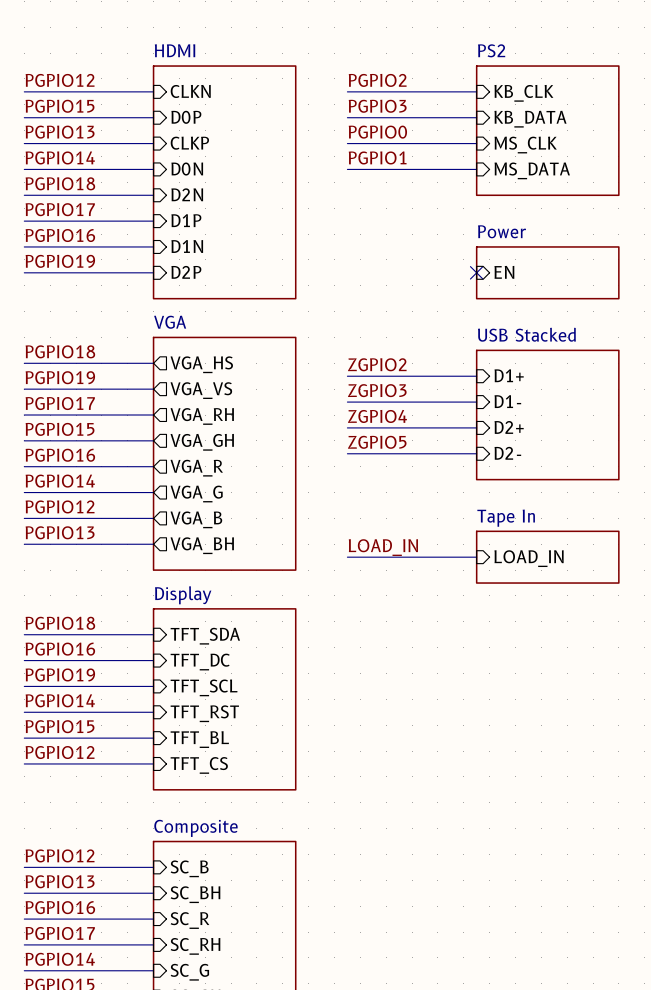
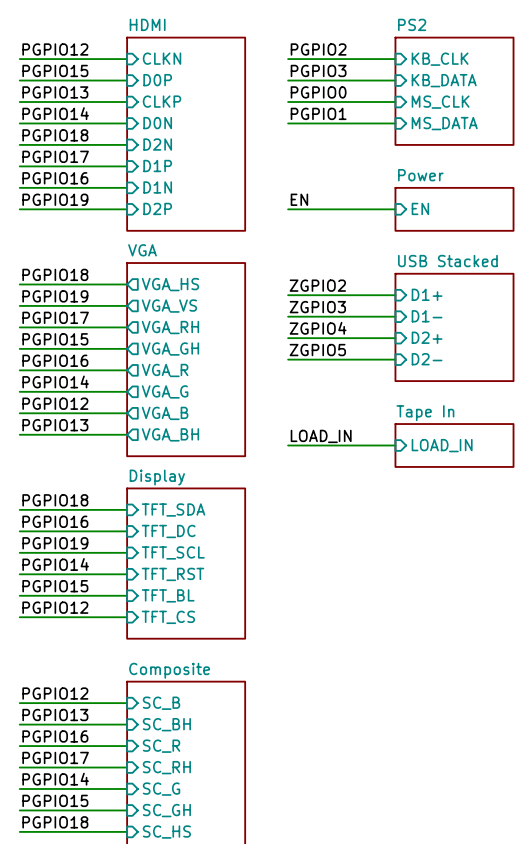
label: none -> EN (299, 199)
wire: none -> (288, 209) (395, 209)
no-connect mark: (476, 272) -> none

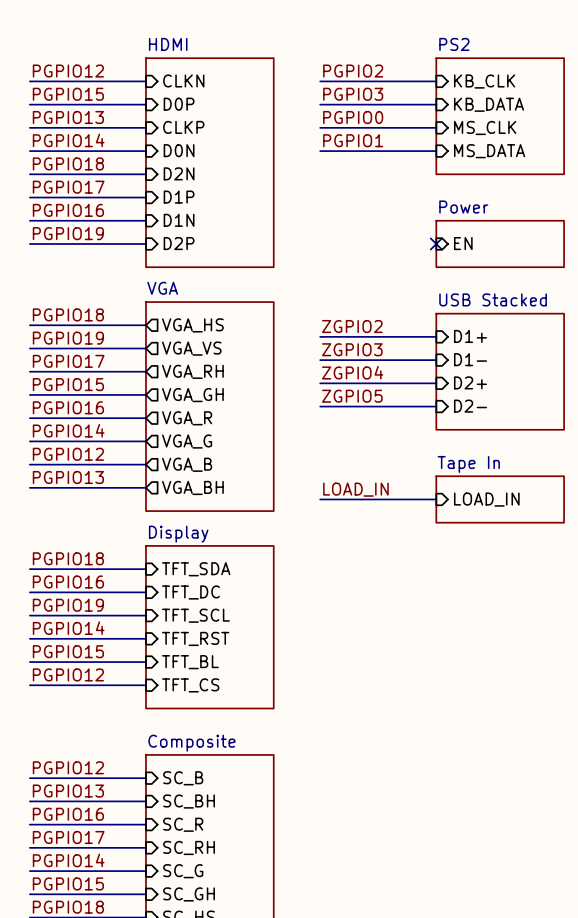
label: EN (299, 199) -> none
wire: (288, 209) (395, 209) -> none
no-connect mark: none -> (436, 243)

